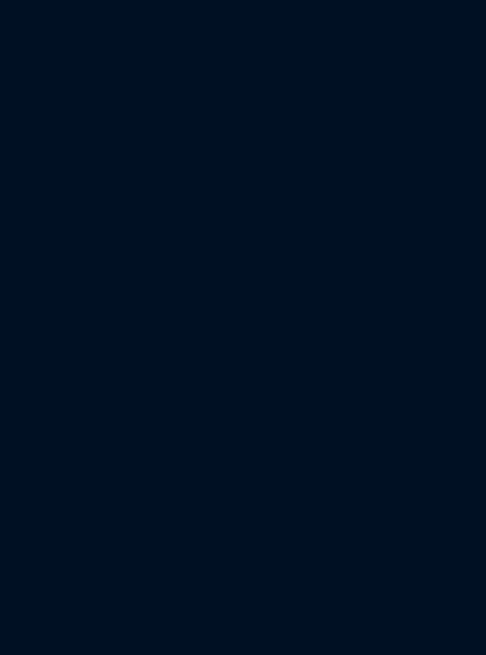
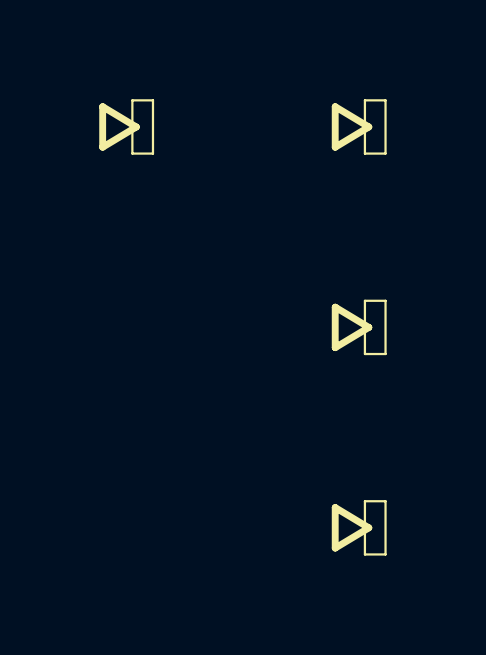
part: none -> (126, 126)
part: none -> (359, 126)
part: none -> (359, 327)
part: none -> (359, 527)

